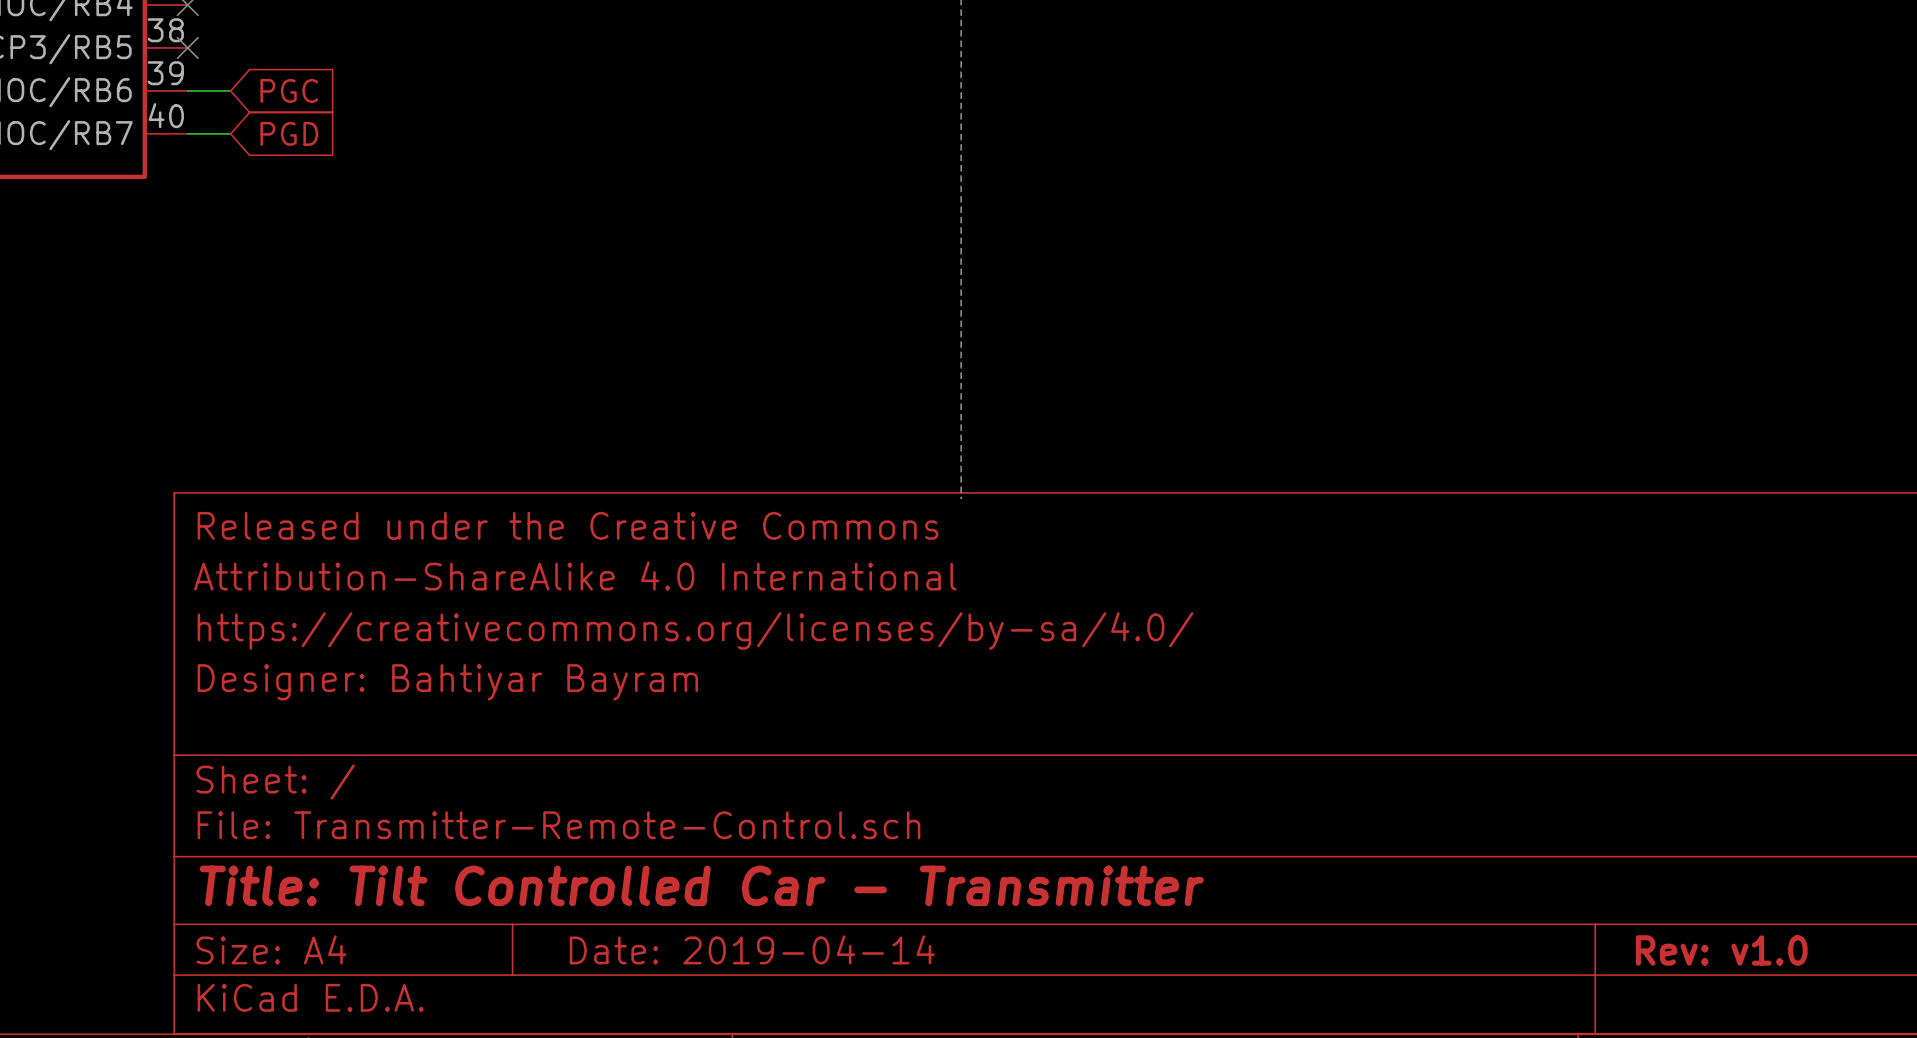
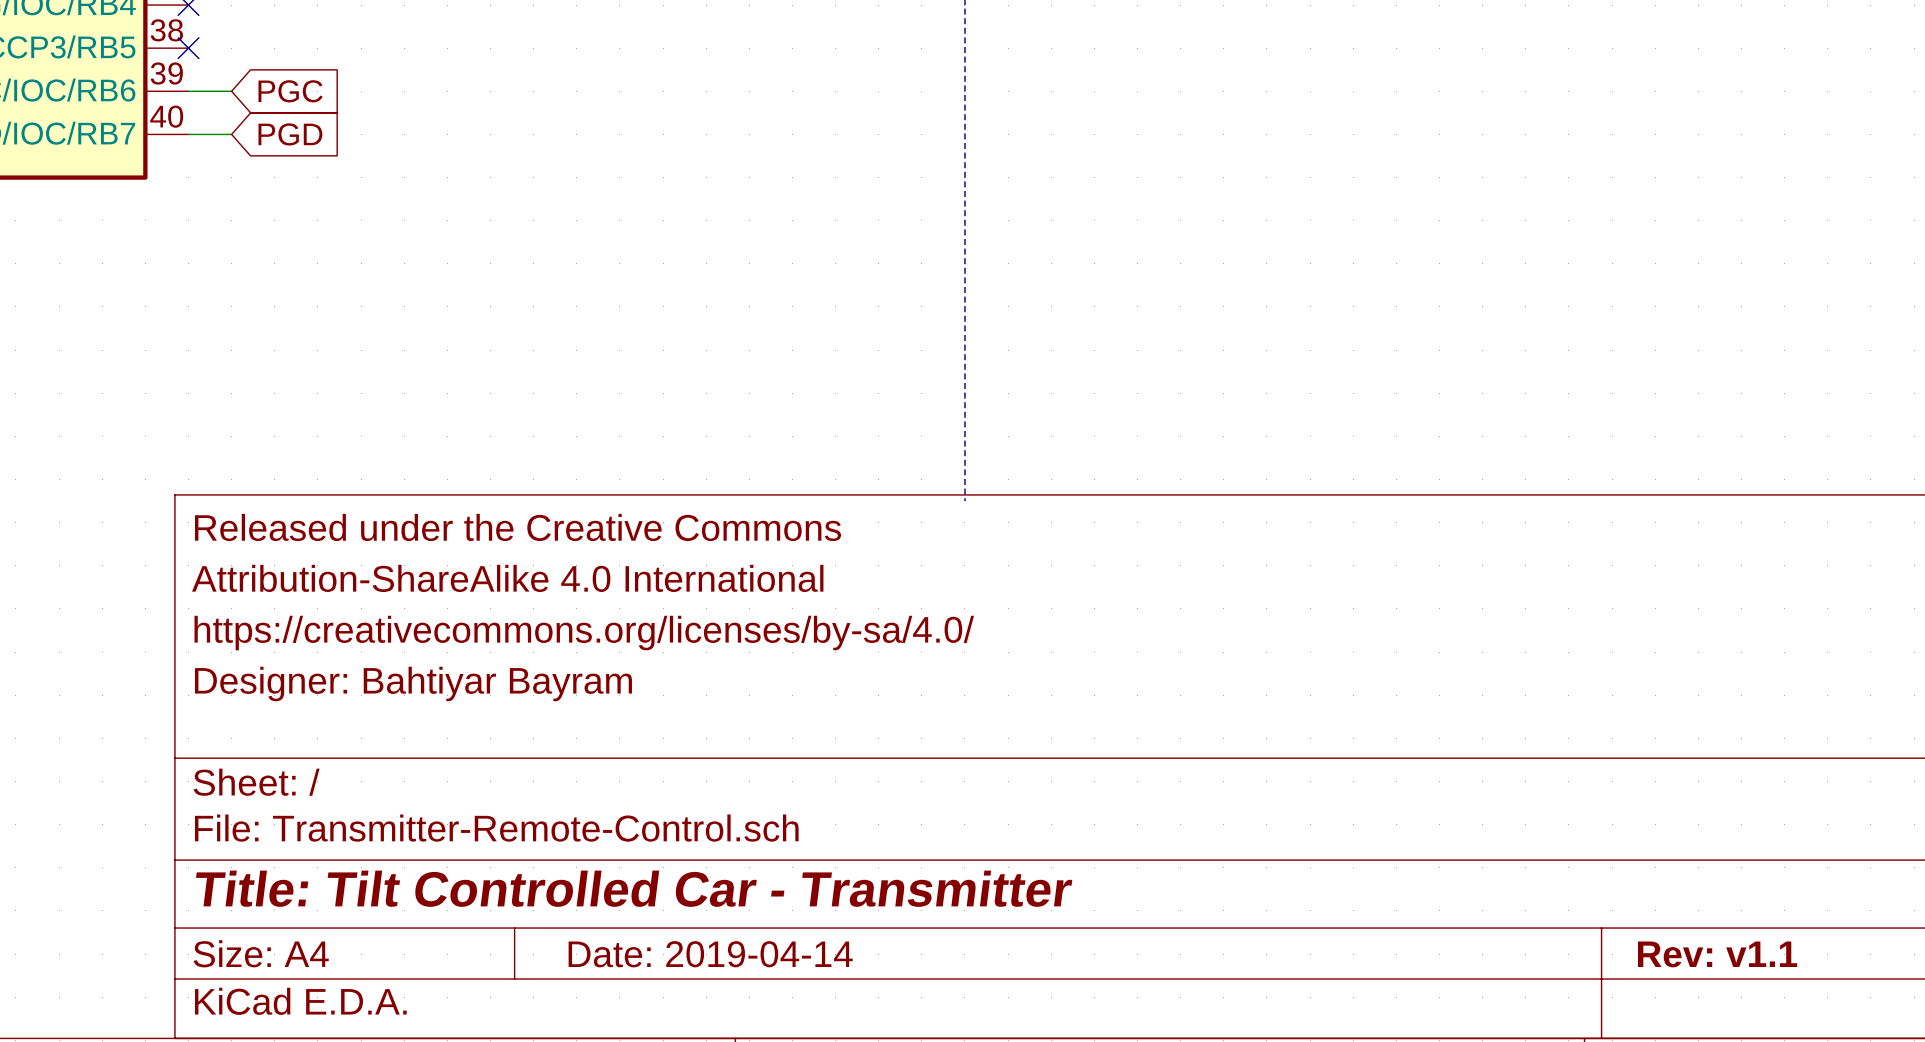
title block: Rev: v1.0 (1721, 950) -> Rev: v1.1 (1717, 954)

